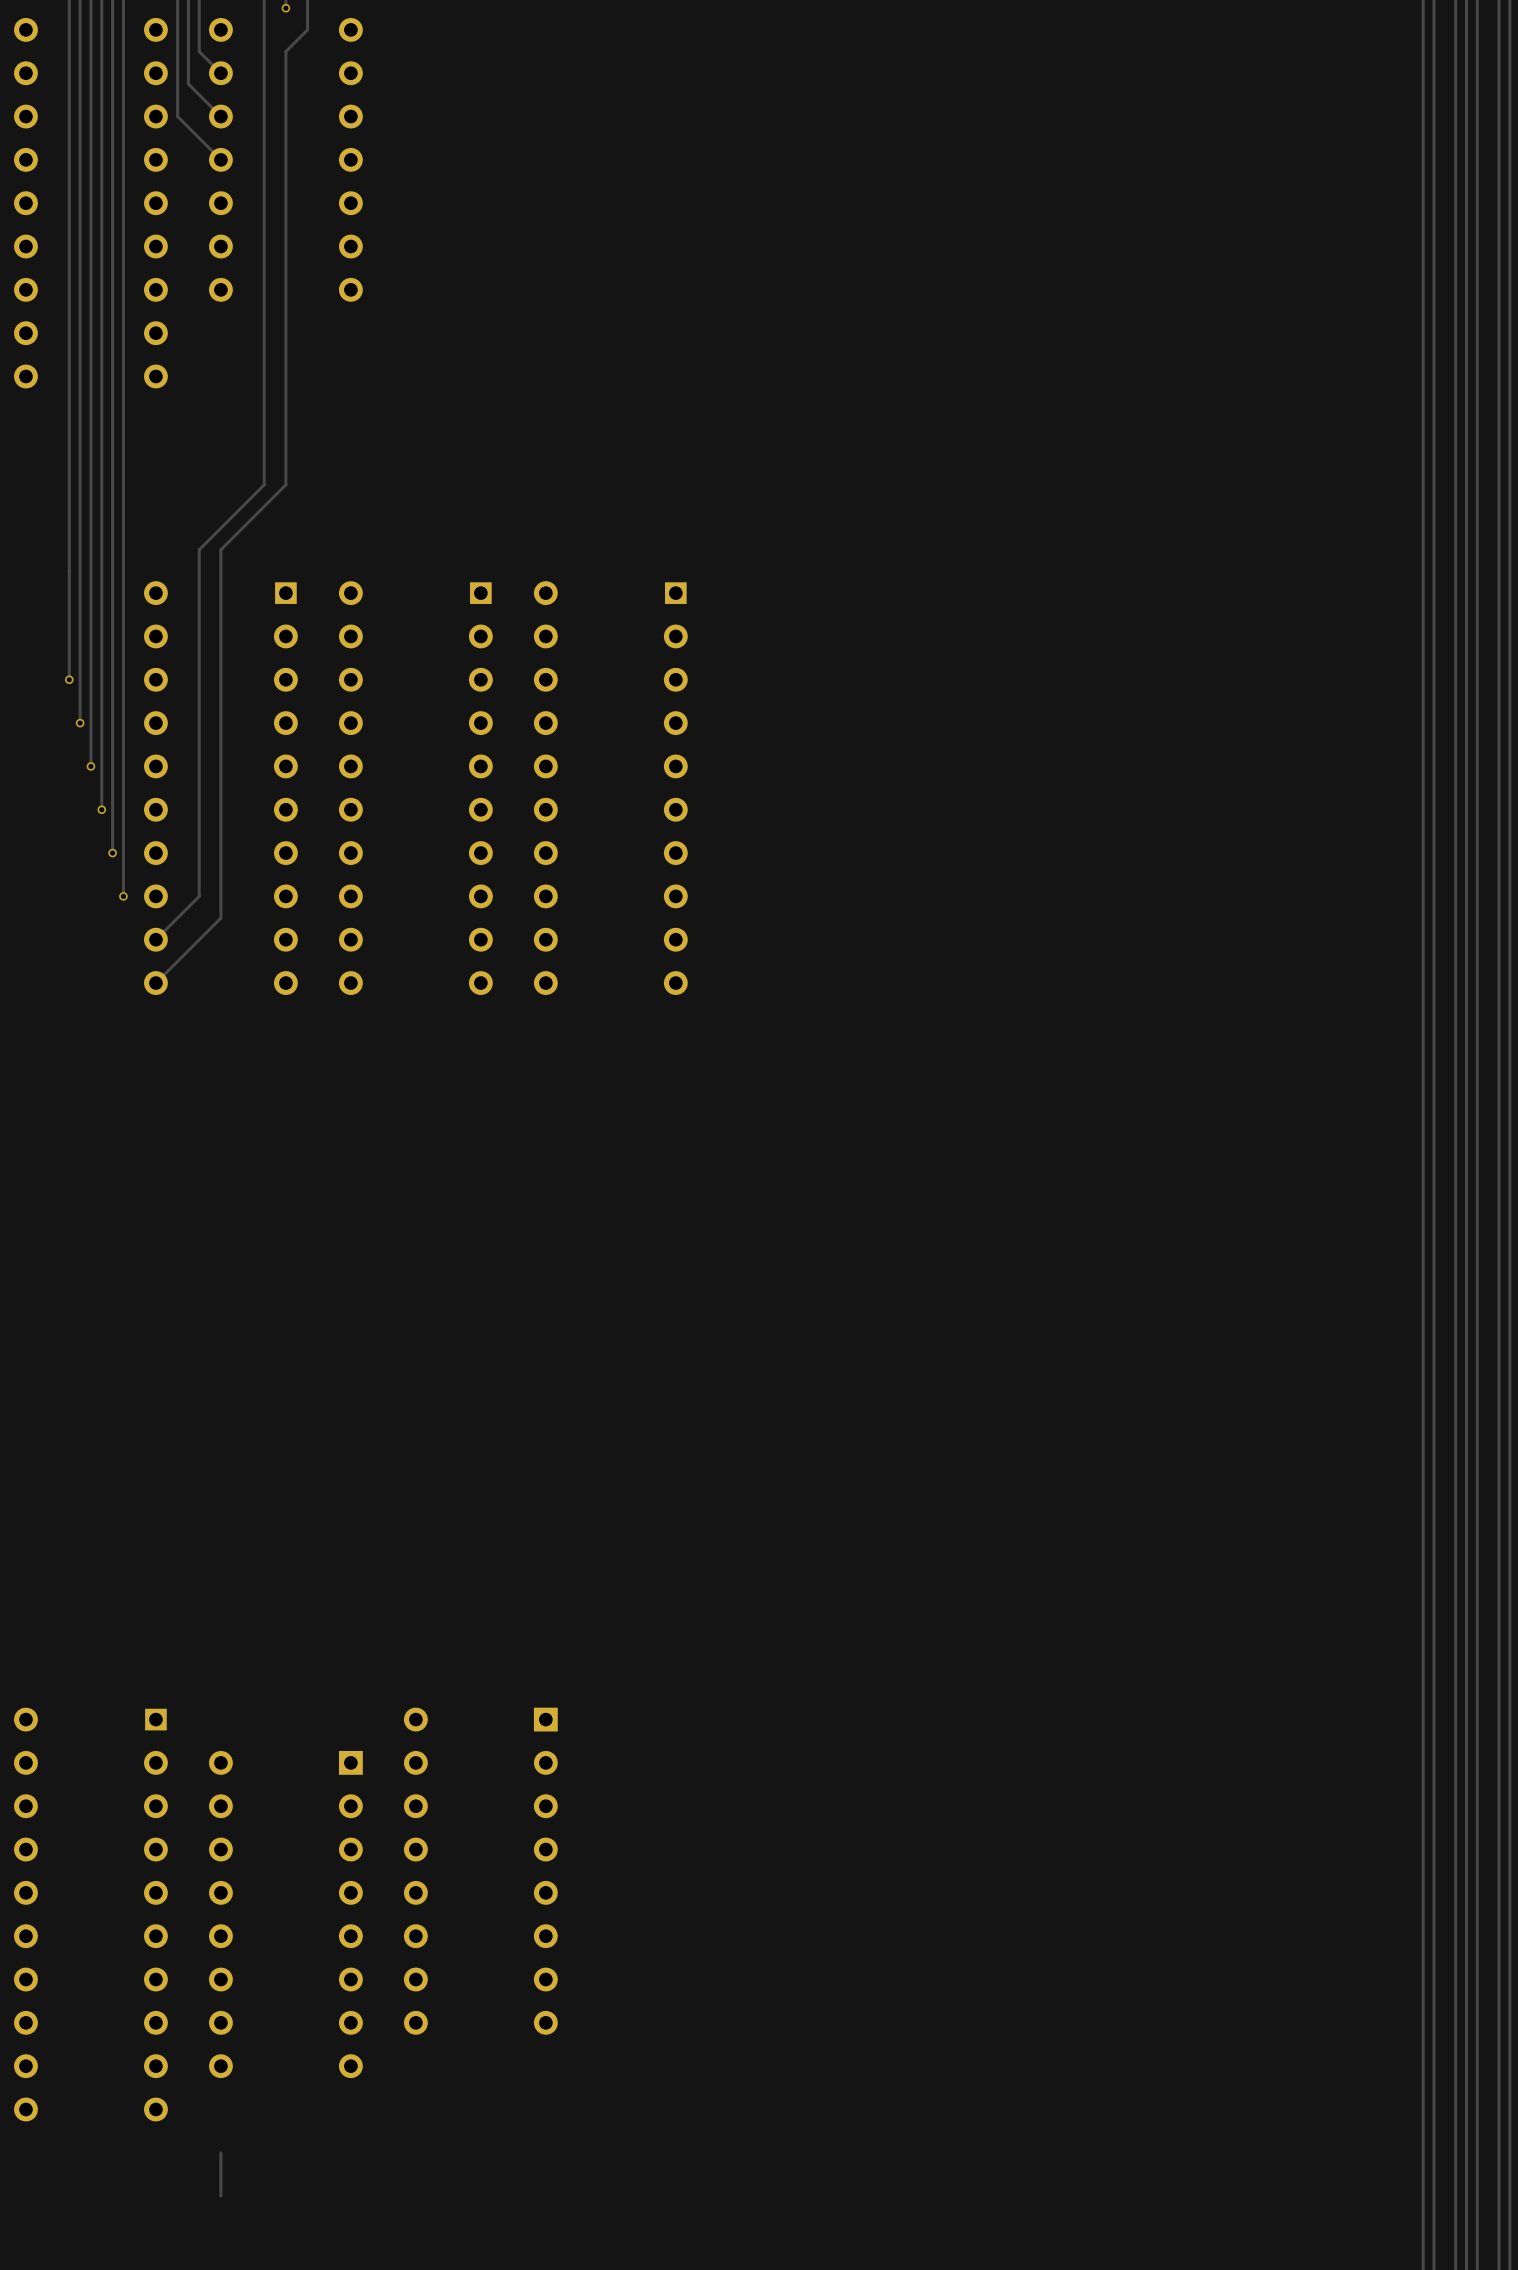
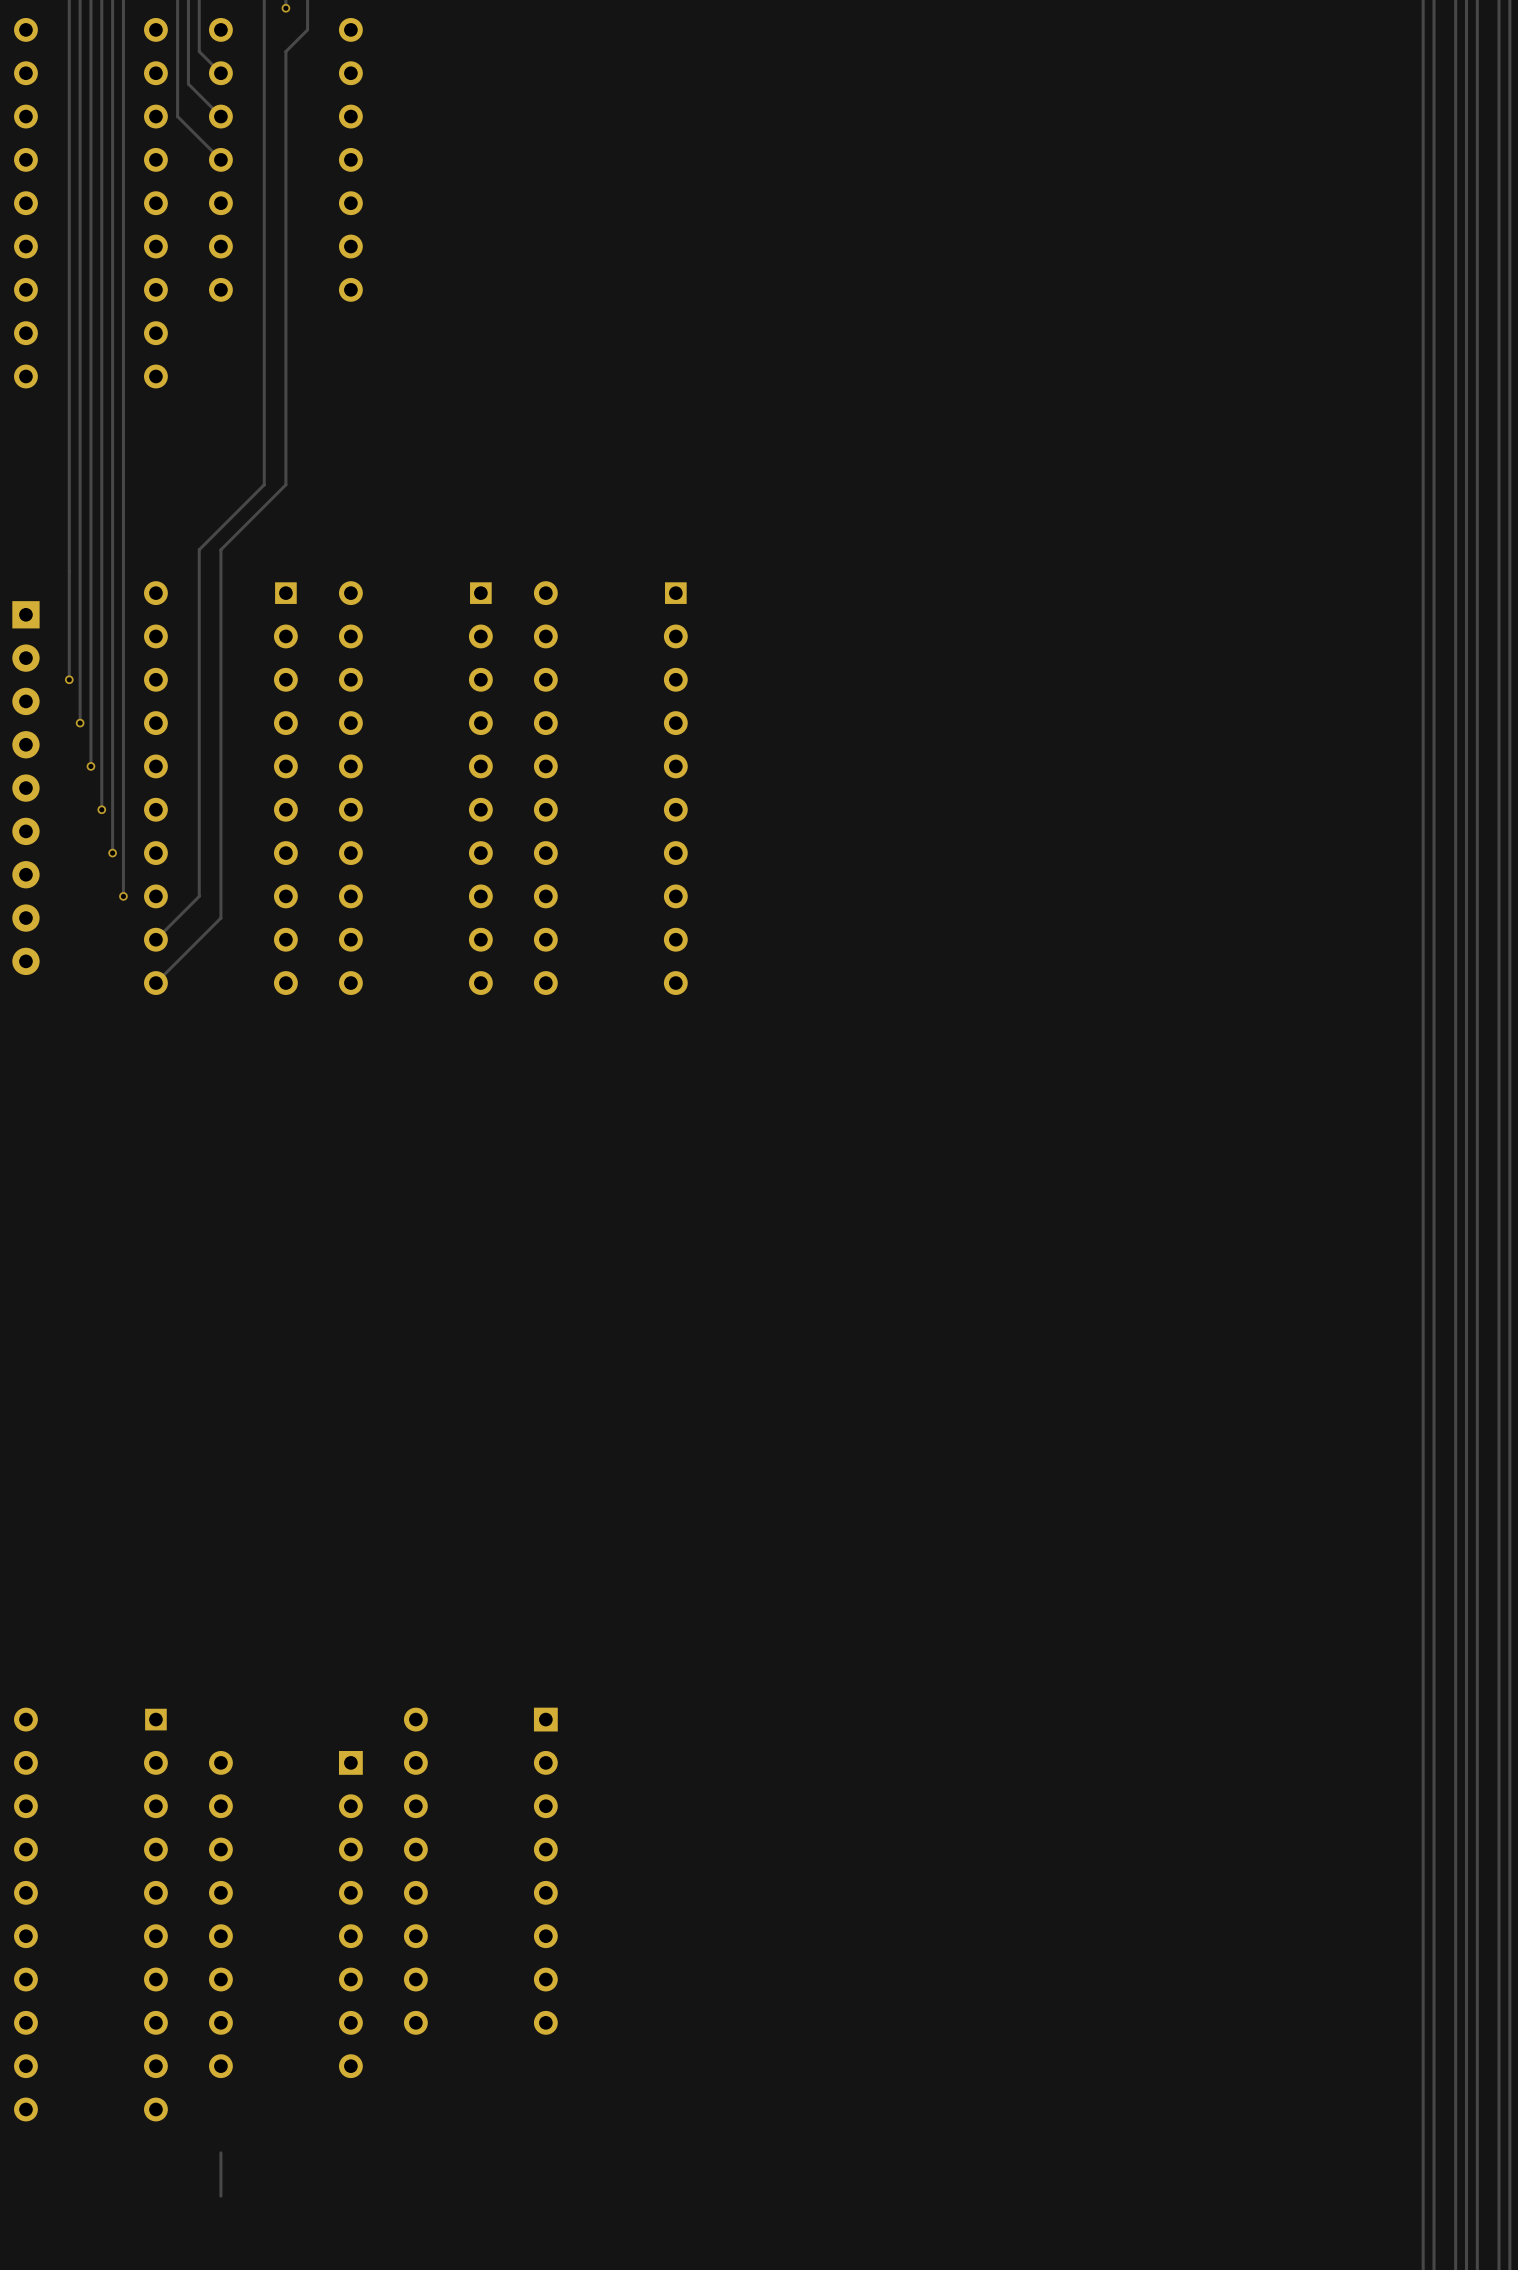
part: none -> (25, 788)

